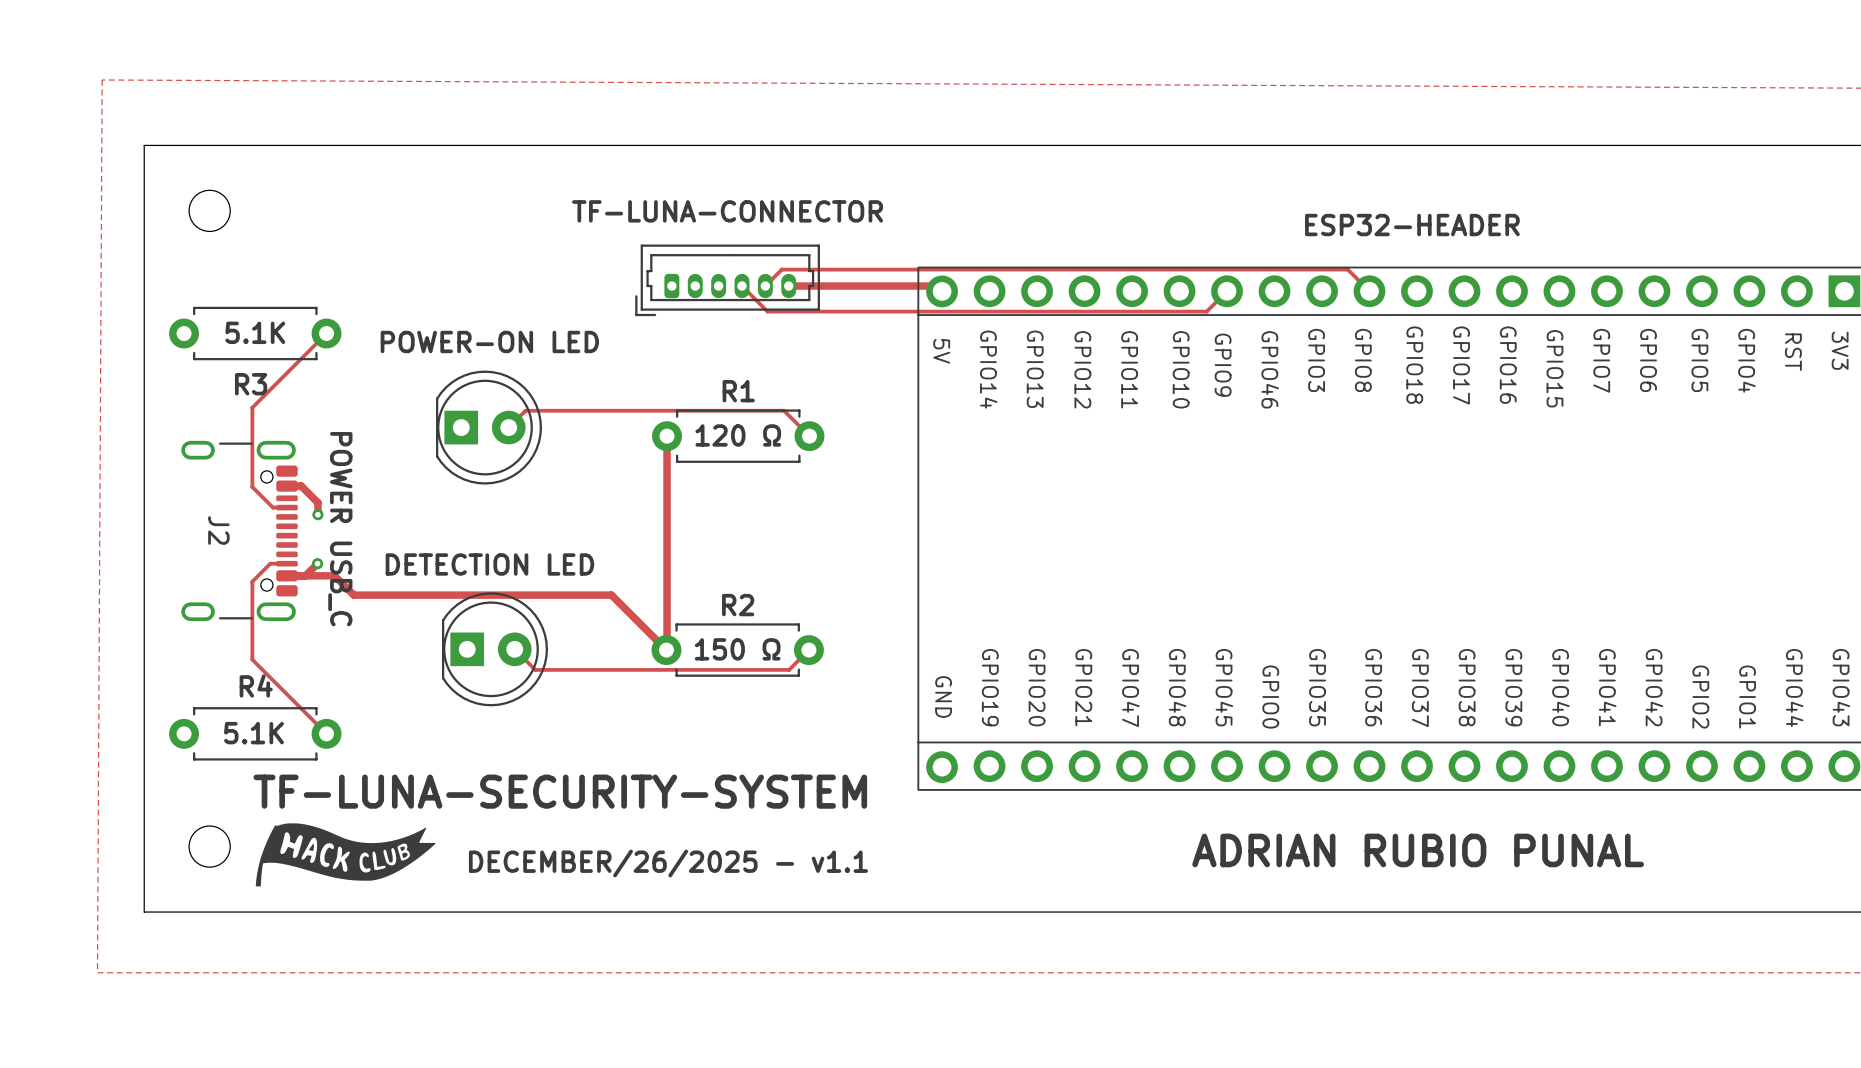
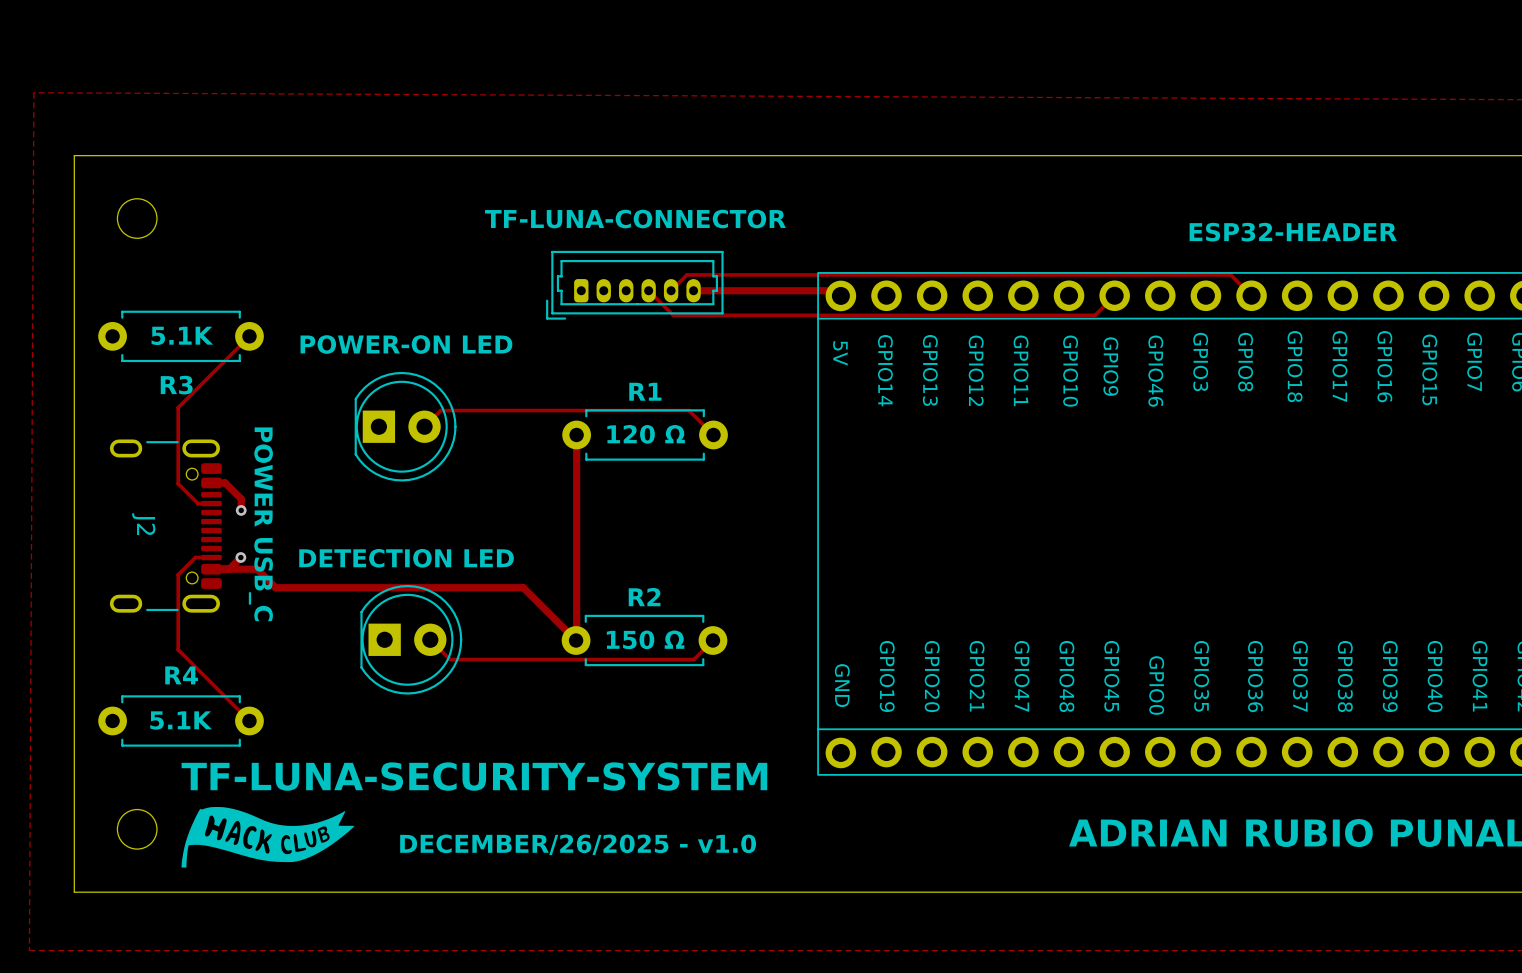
text: DECEMBER/26/2025 - v1.1 (668, 863) -> DECEMBER/26/2025 - v1.0 (578, 844)

